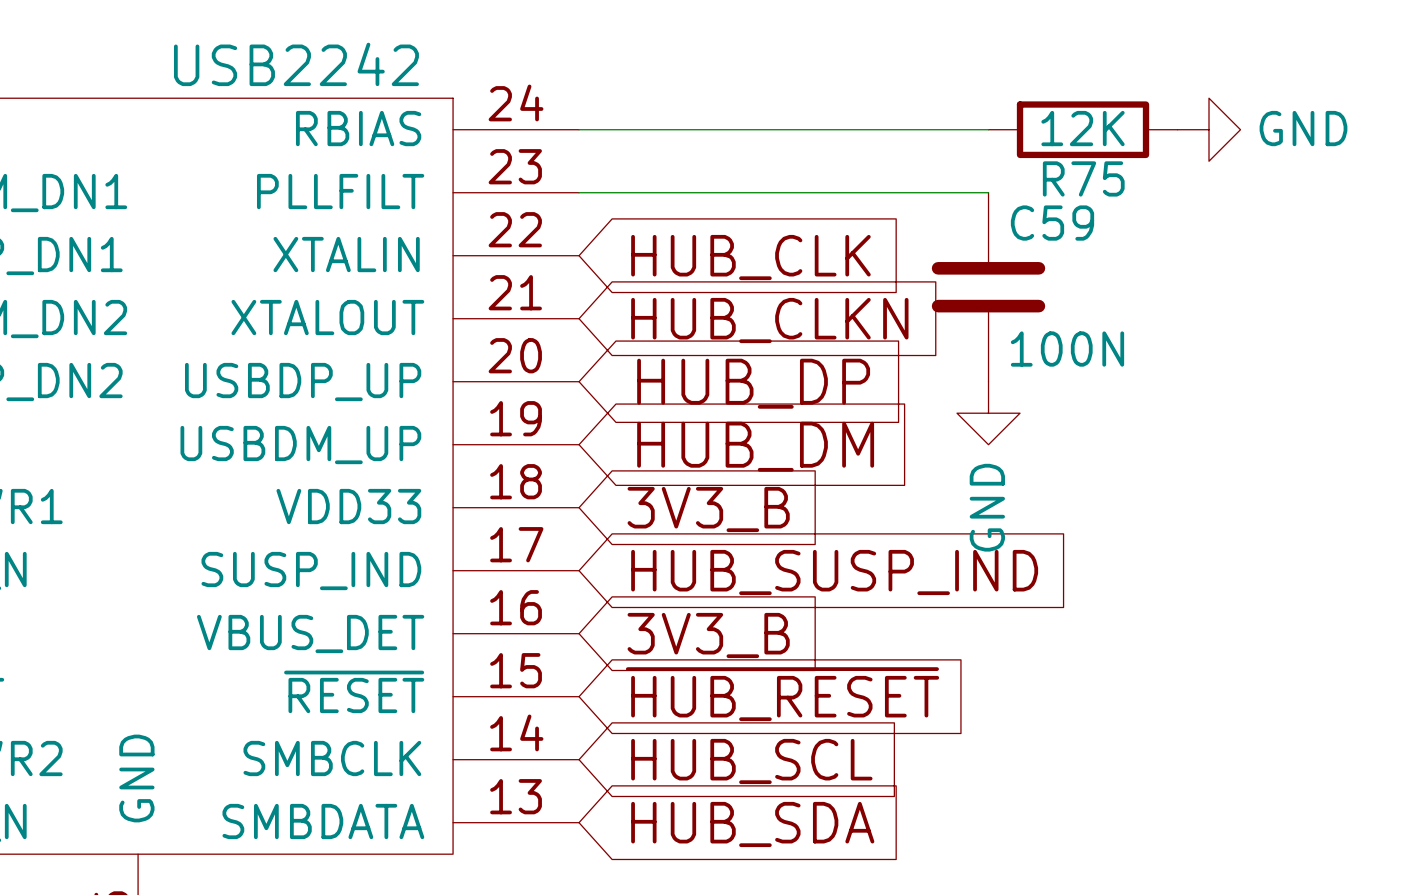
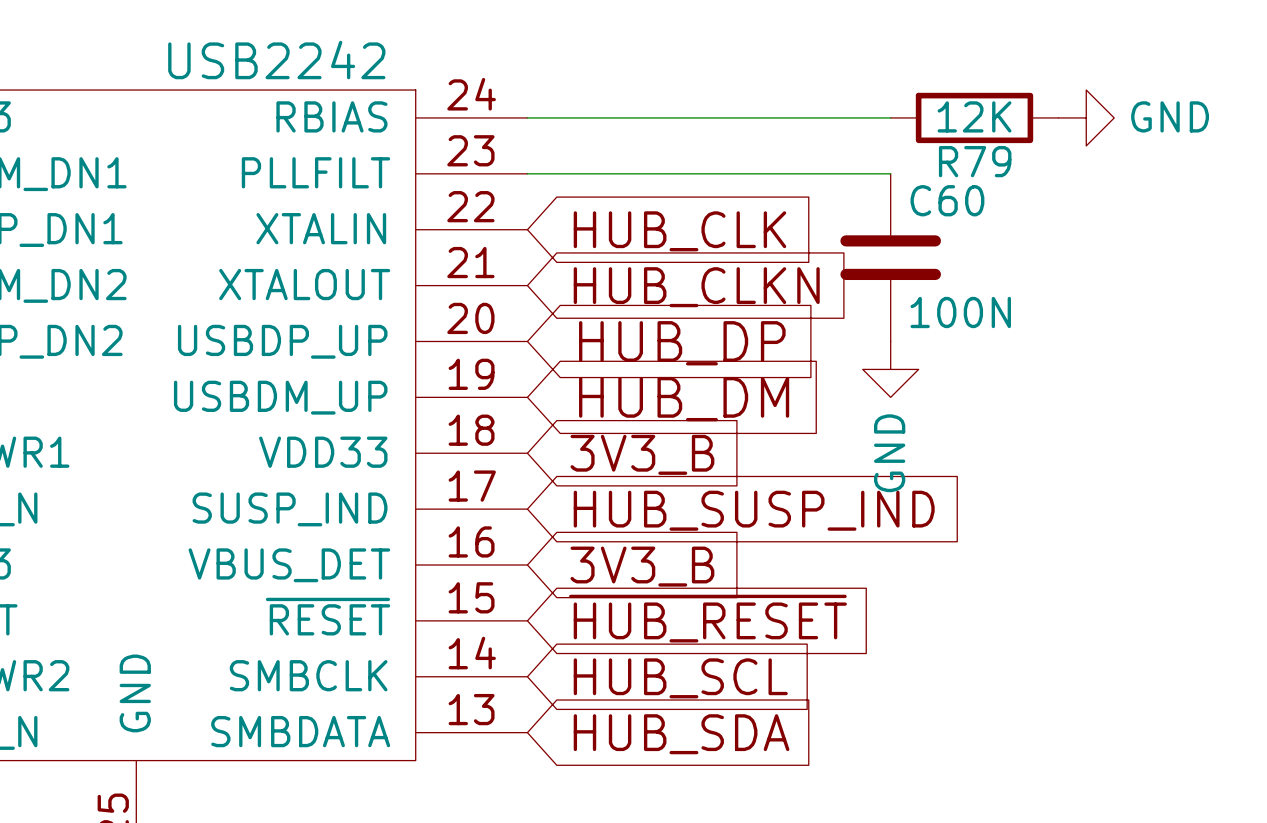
R75 name: R75 (1083, 178) -> R79 (975, 161)
C59 name: C59 (1052, 223) -> C60 (947, 200)

